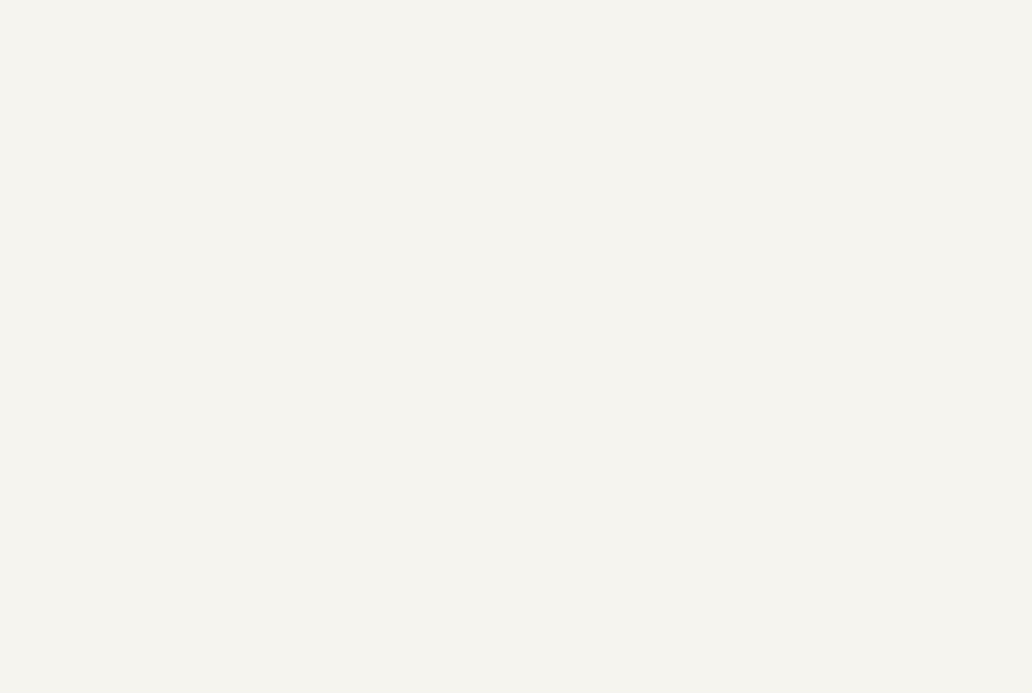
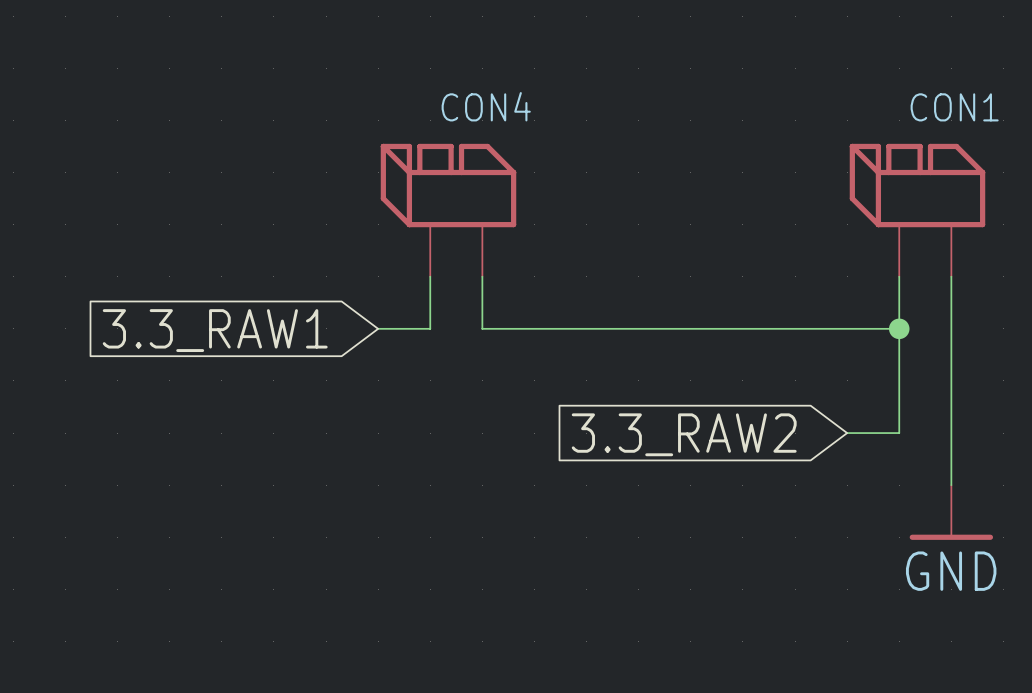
CON4: none -> (448, 210)
CON1: none -> (917, 210)
wire: none -> (430, 276) (430, 328) (378, 328)
wire: none -> (482, 276) (482, 328) (899, 328)
wire: none -> (899, 276) (899, 433) (847, 433)
wire: none -> (951, 276) (951, 485)
junction: none -> (899, 328)
global label: none -> 3.3_RAW1 (215, 330)
global label: none -> 3.3_RAW2 (684, 434)
power symbol: none -> GND (951, 512)

